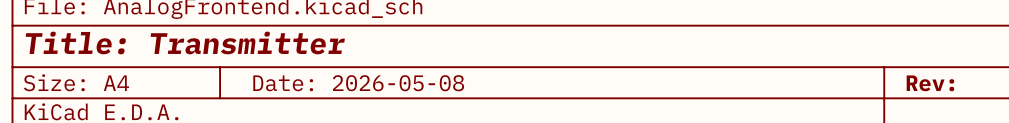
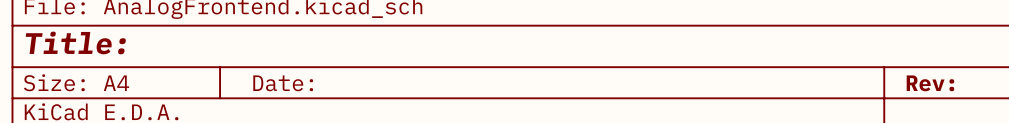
title block: Title: Transmitter (185, 42) -> Title: (75, 42)
title block: Date: 2026-05-08 (358, 83) -> Date: (283, 83)

